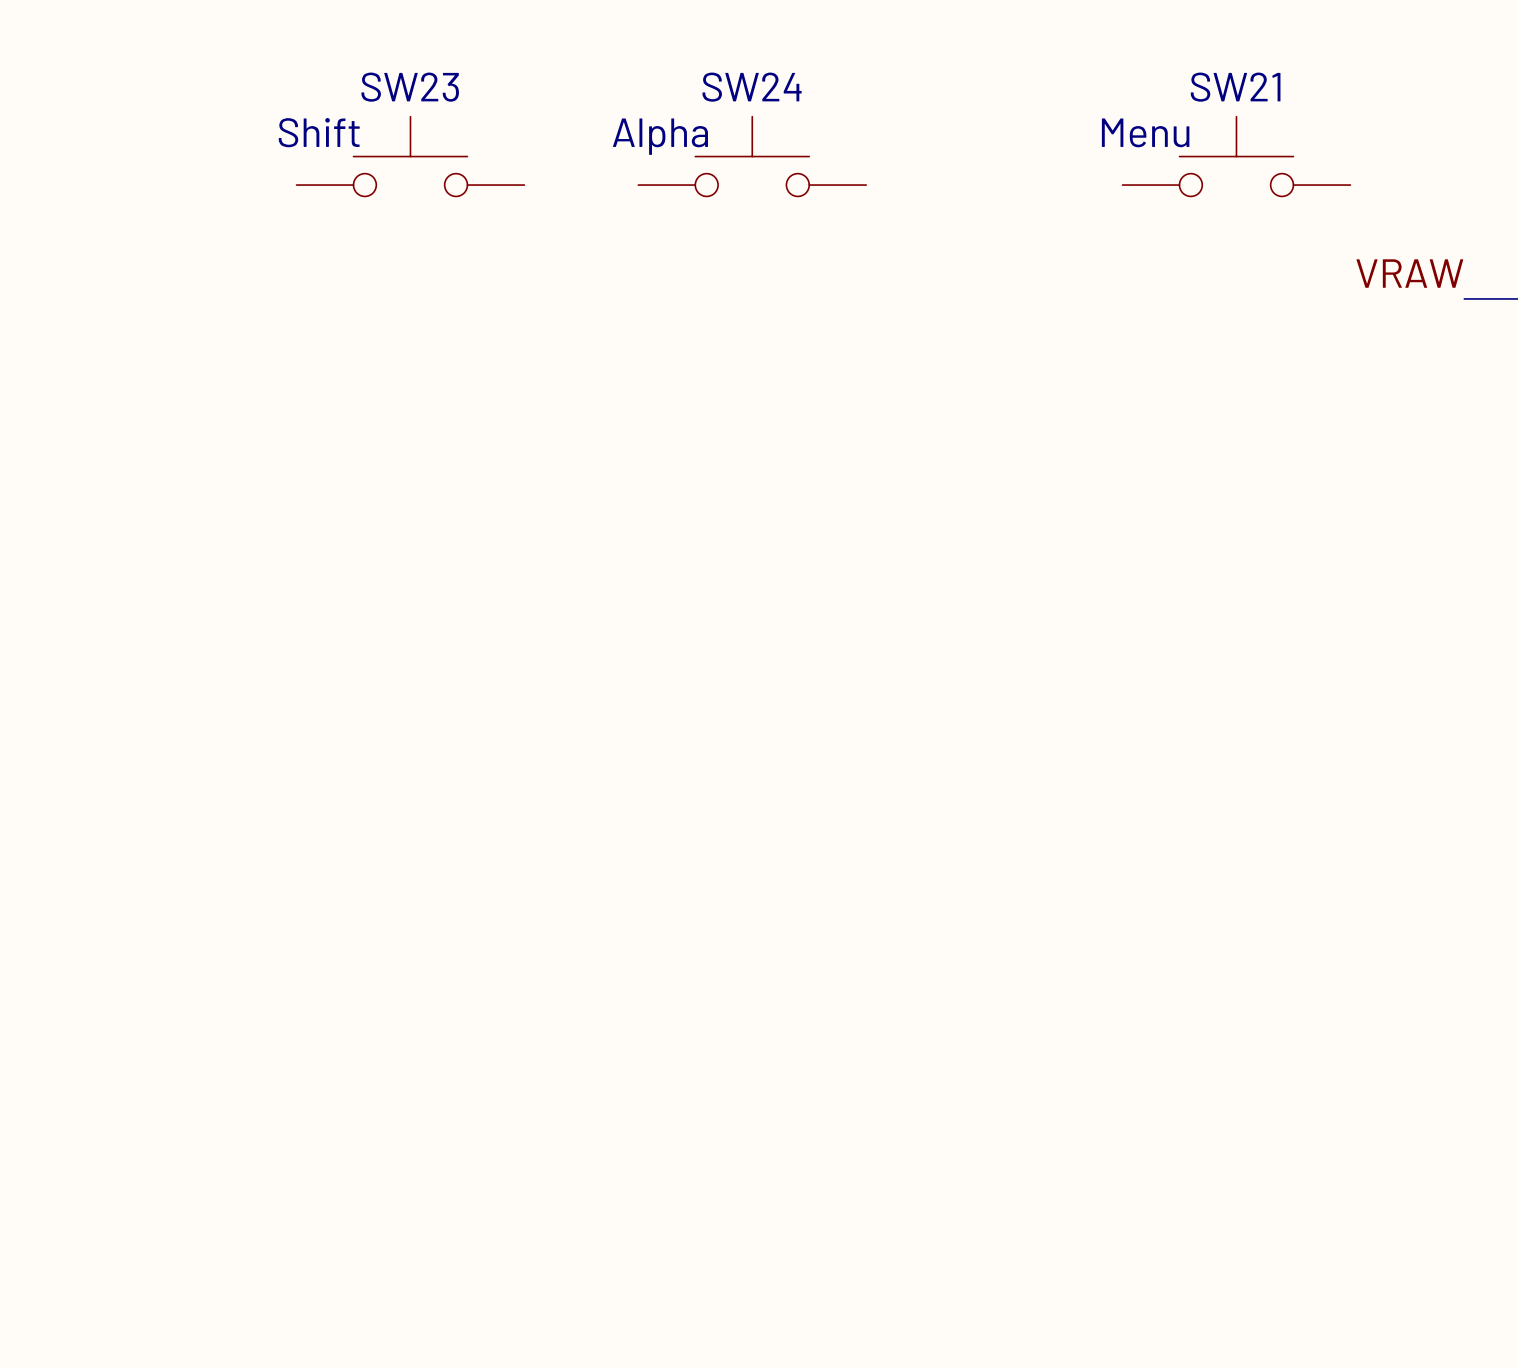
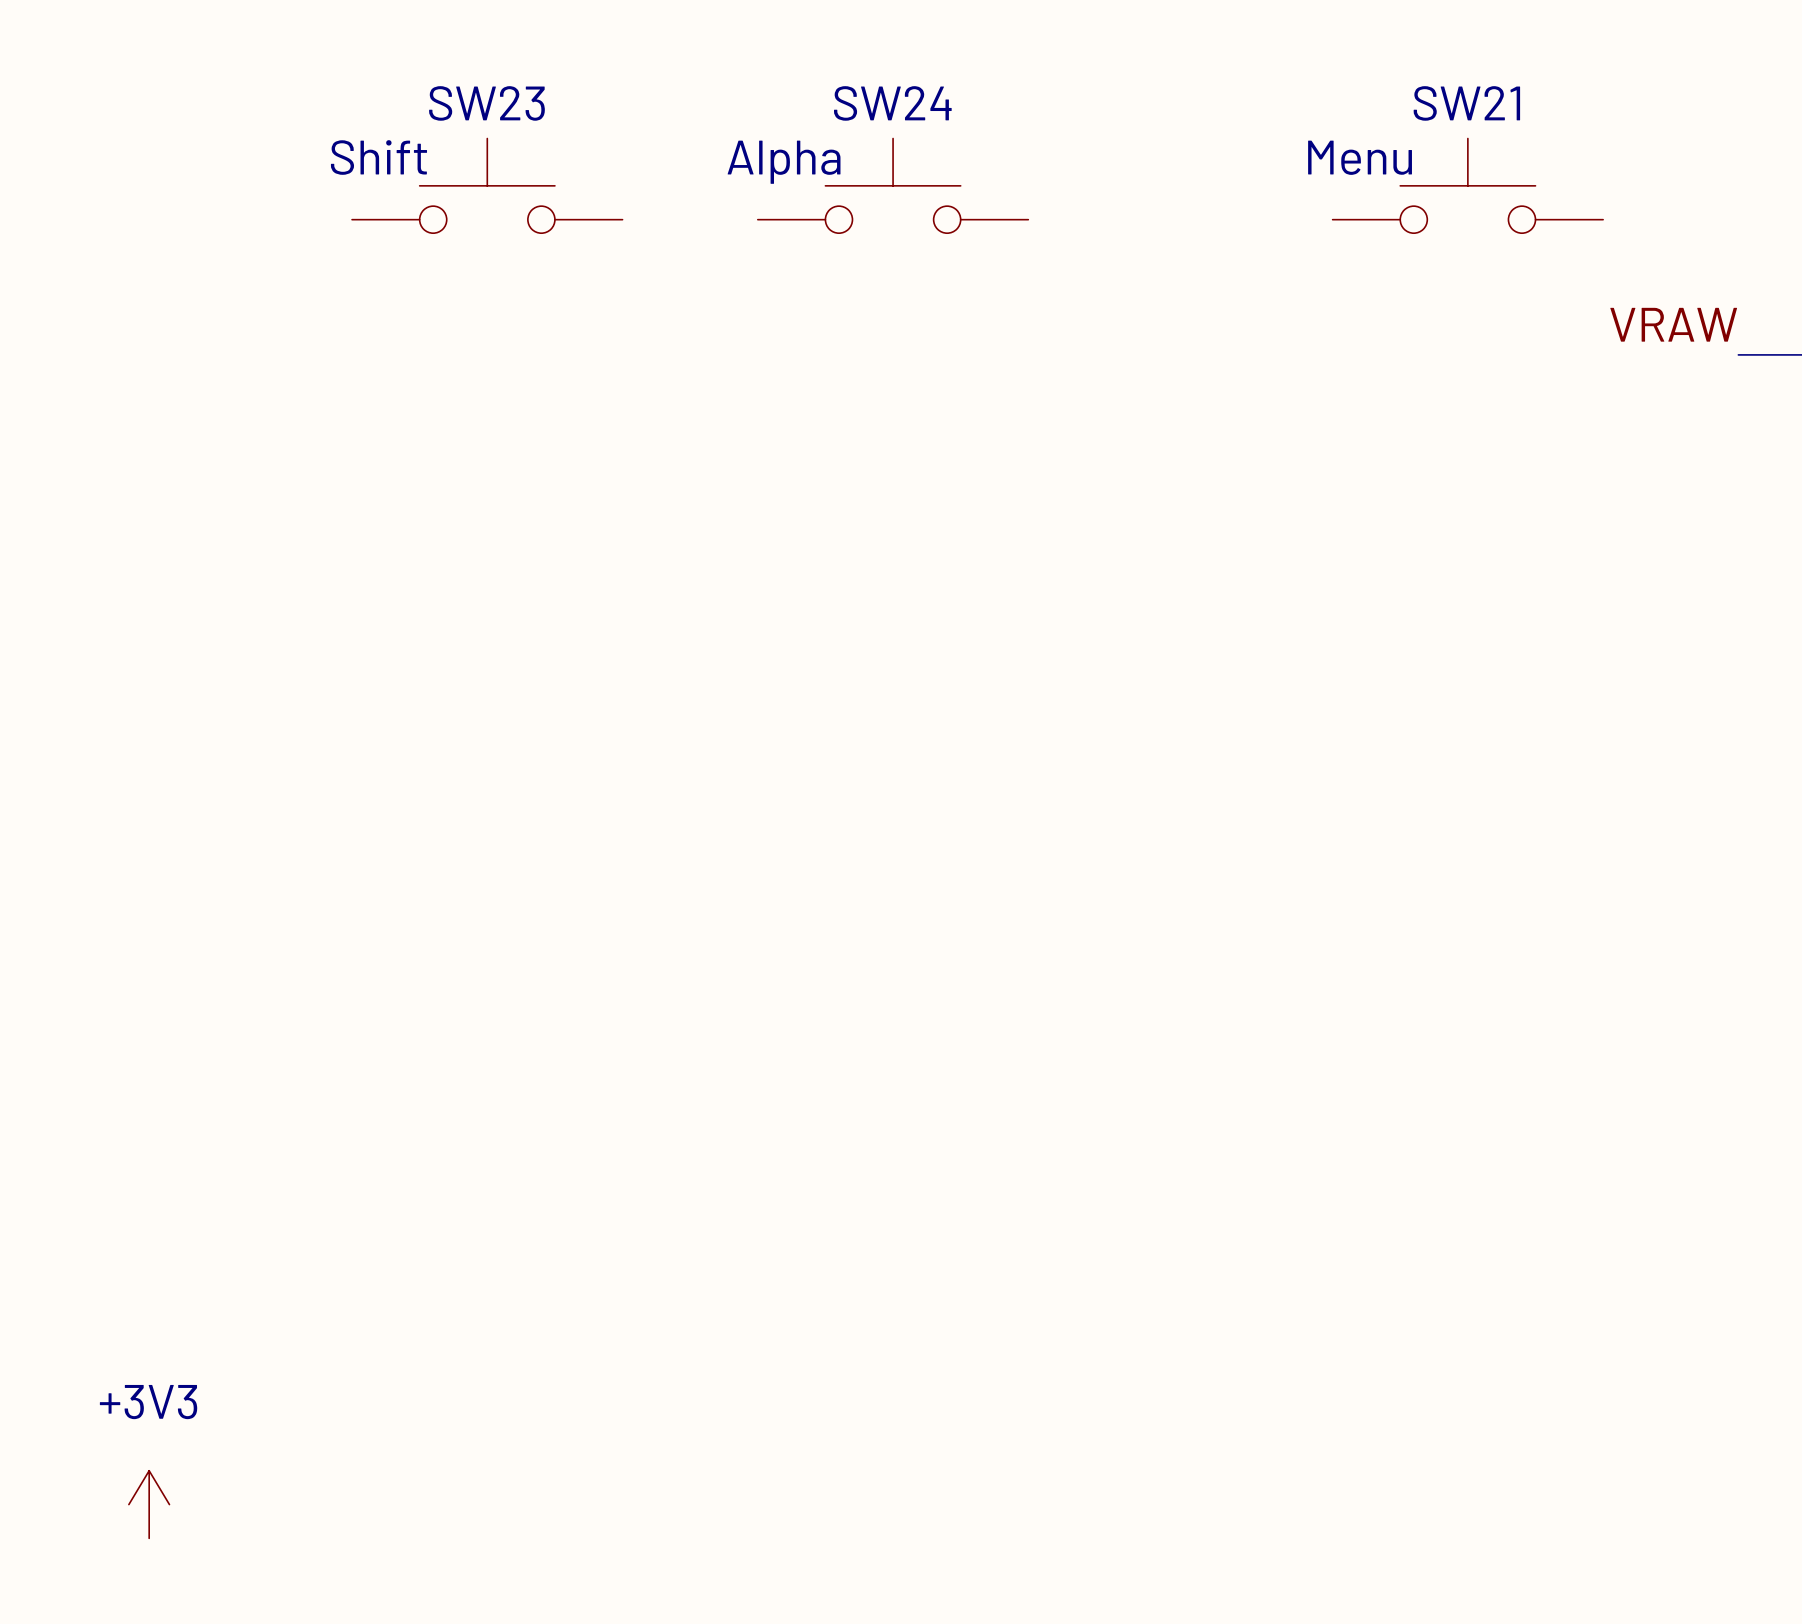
power symbol: none -> +3V3 (149, 1504)

